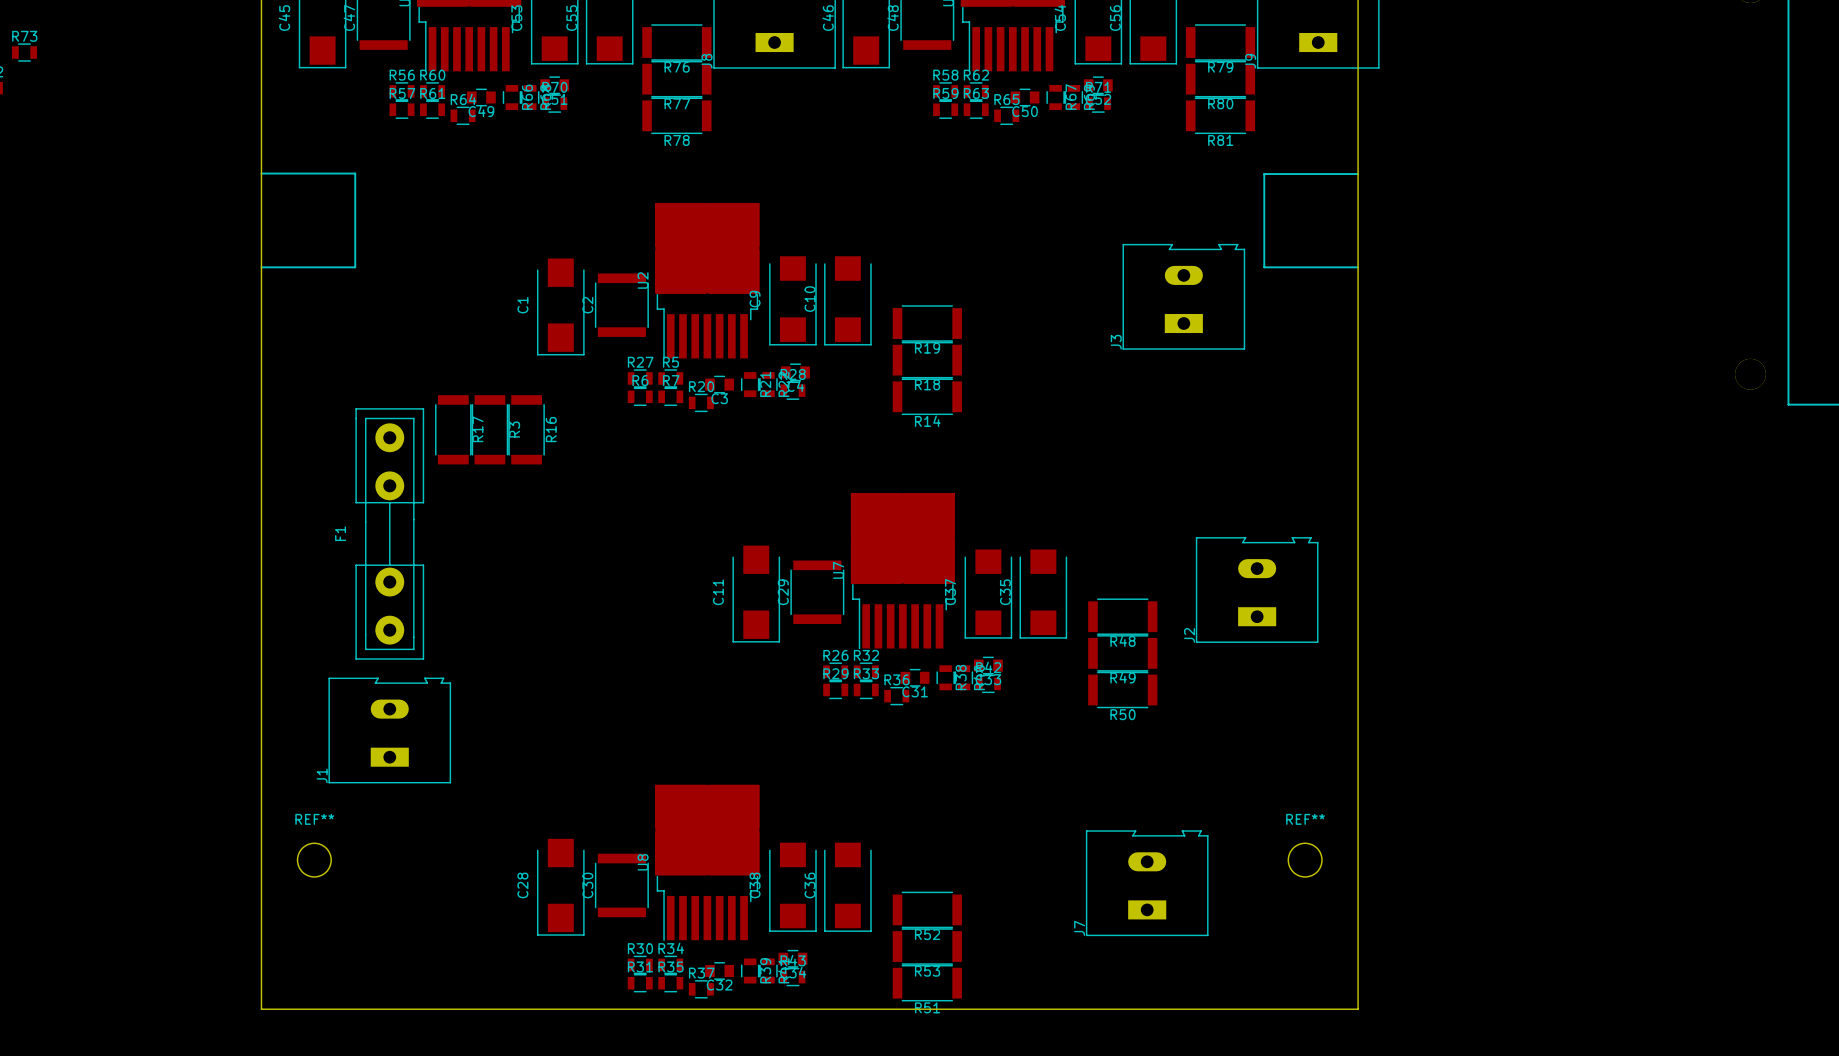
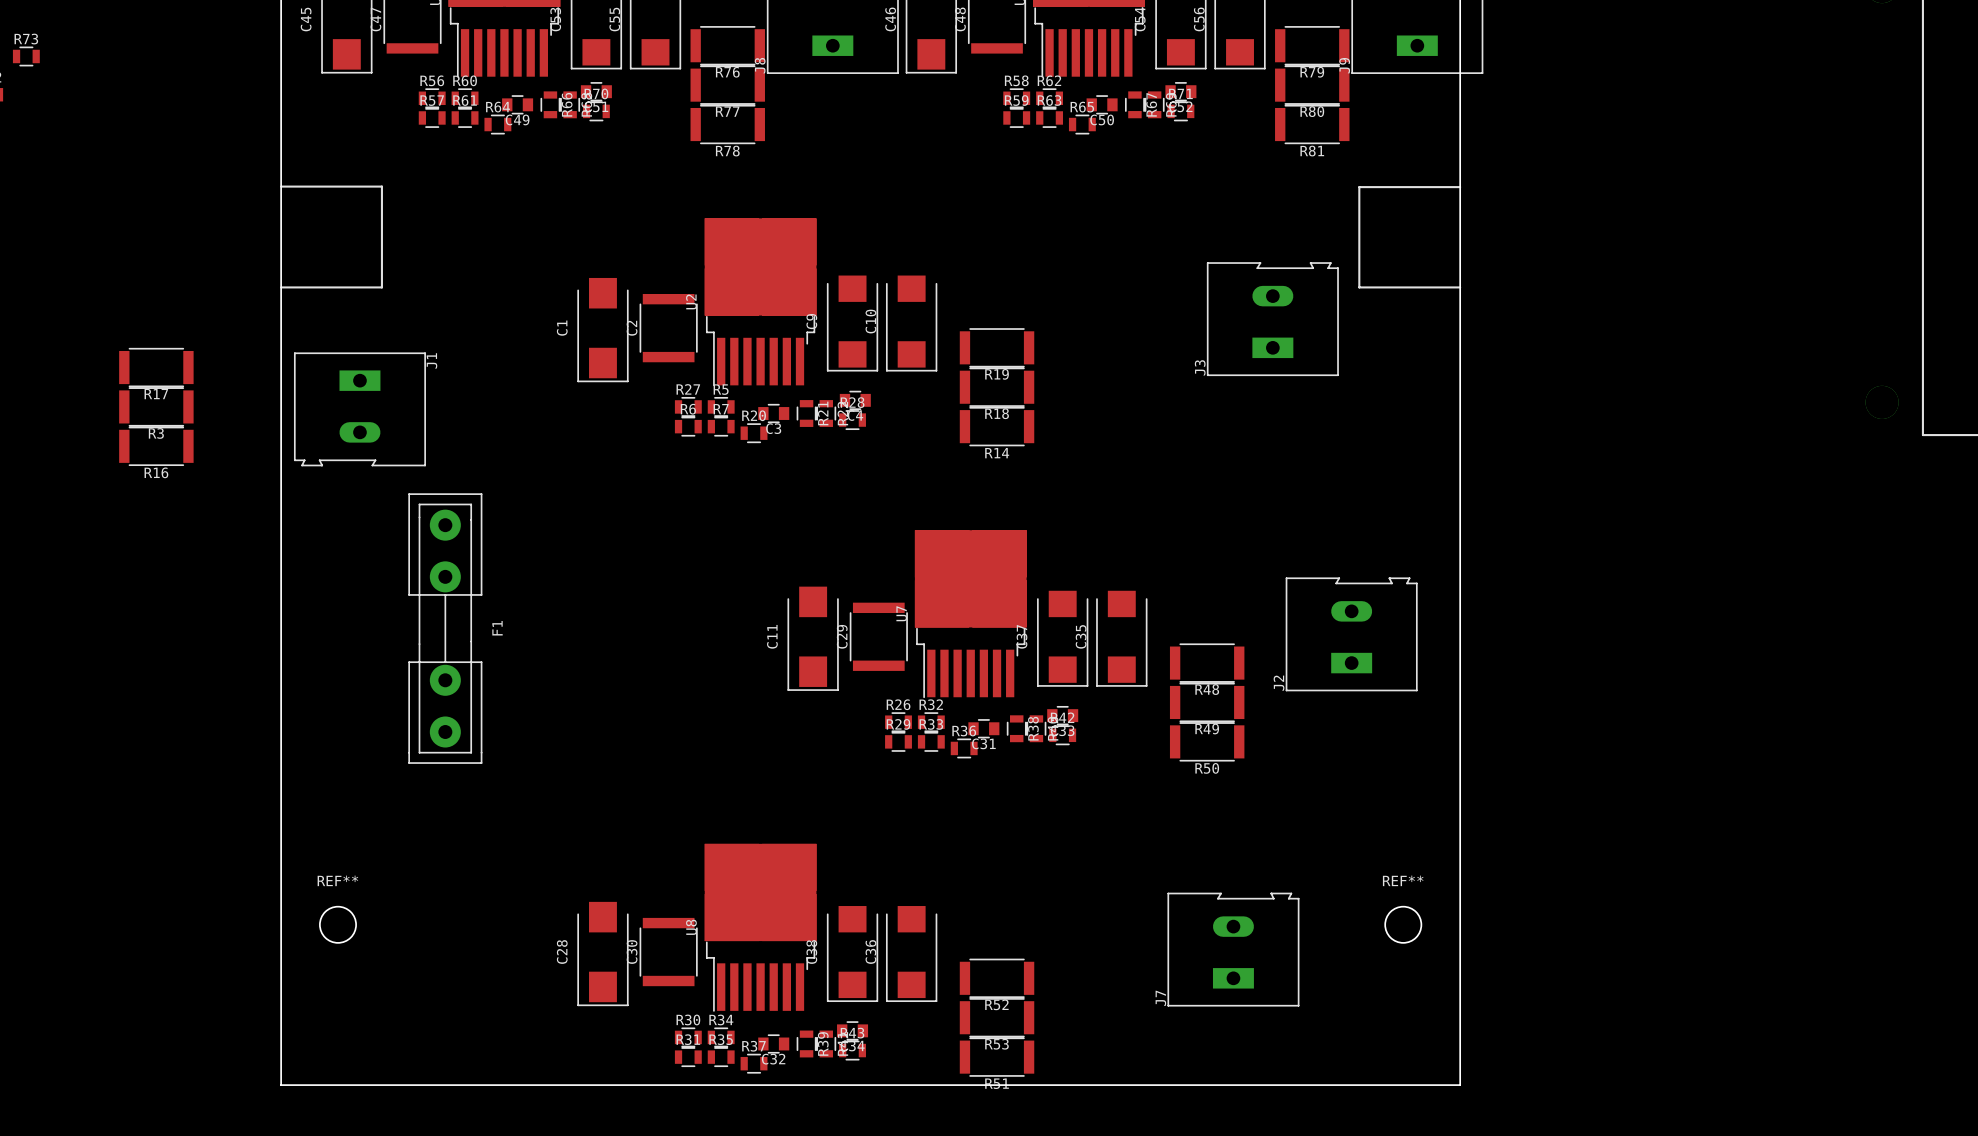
R17 rotation: 0° (453, 429) -> 90° clockwise (156, 367)
R17 position: (453, 429) -> (156, 367)
R3 rotation: 0° (489, 429) -> 90° clockwise (156, 406)
R3 position: (489, 429) -> (156, 406)
R16 rotation: 0° (526, 429) -> 90° clockwise (156, 446)
R16 position: (526, 429) -> (156, 446)
F1 rotation: 0° (389, 533) -> 180° (445, 628)
J1 rotation: 0° (389, 730) -> 180° (359, 409)
J1 position: (389, 730) -> (359, 409)

